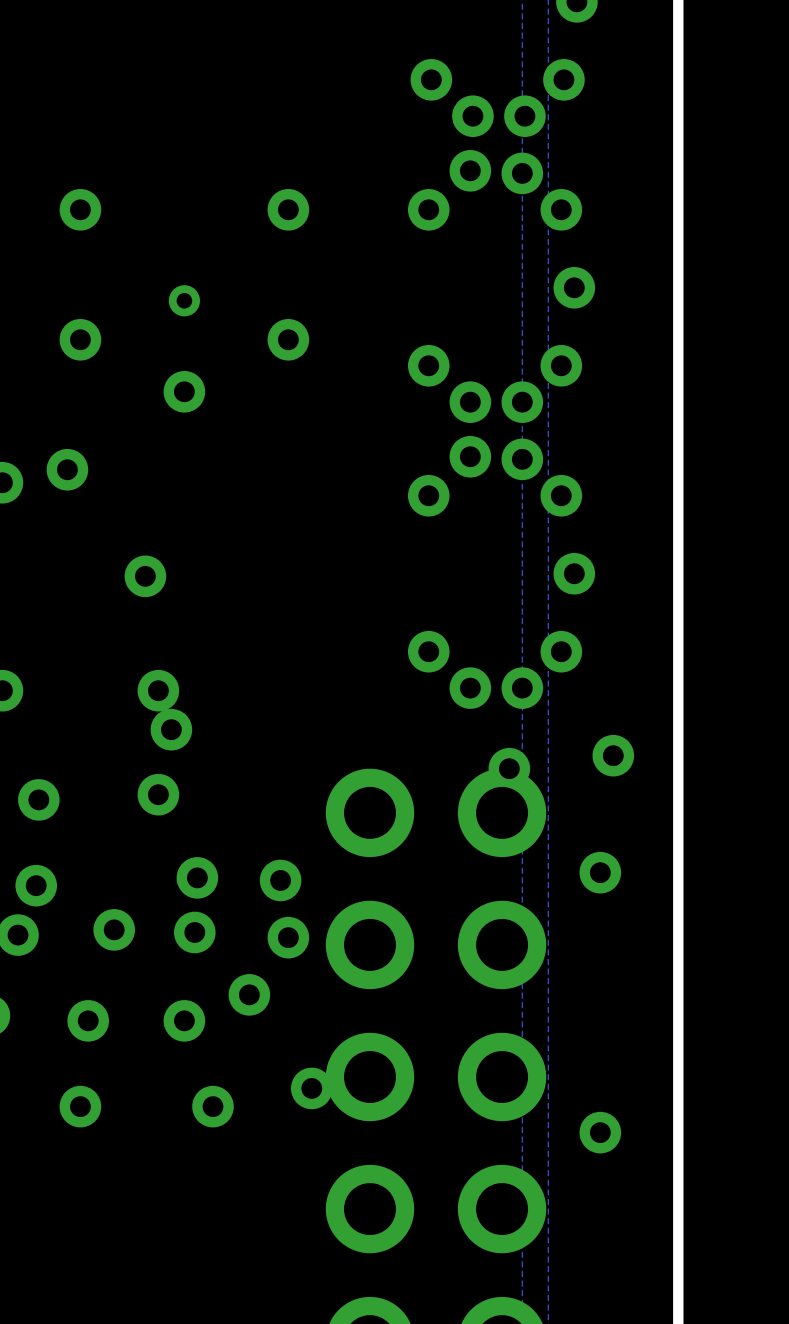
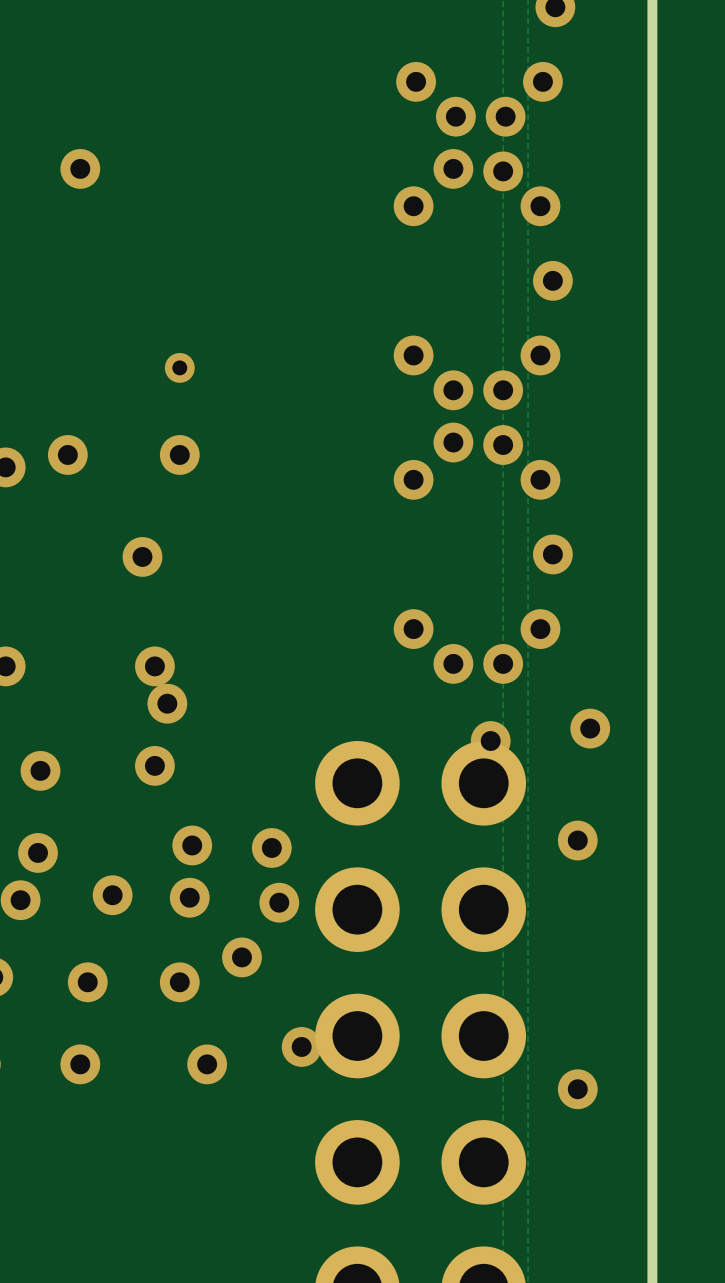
via position: (80, 209) -> (80, 168)
via: (288, 209) -> none
via position: (184, 300) -> (179, 367)
via: (80, 339) -> none
via: (288, 339) -> none
via position: (184, 391) -> (179, 454)

